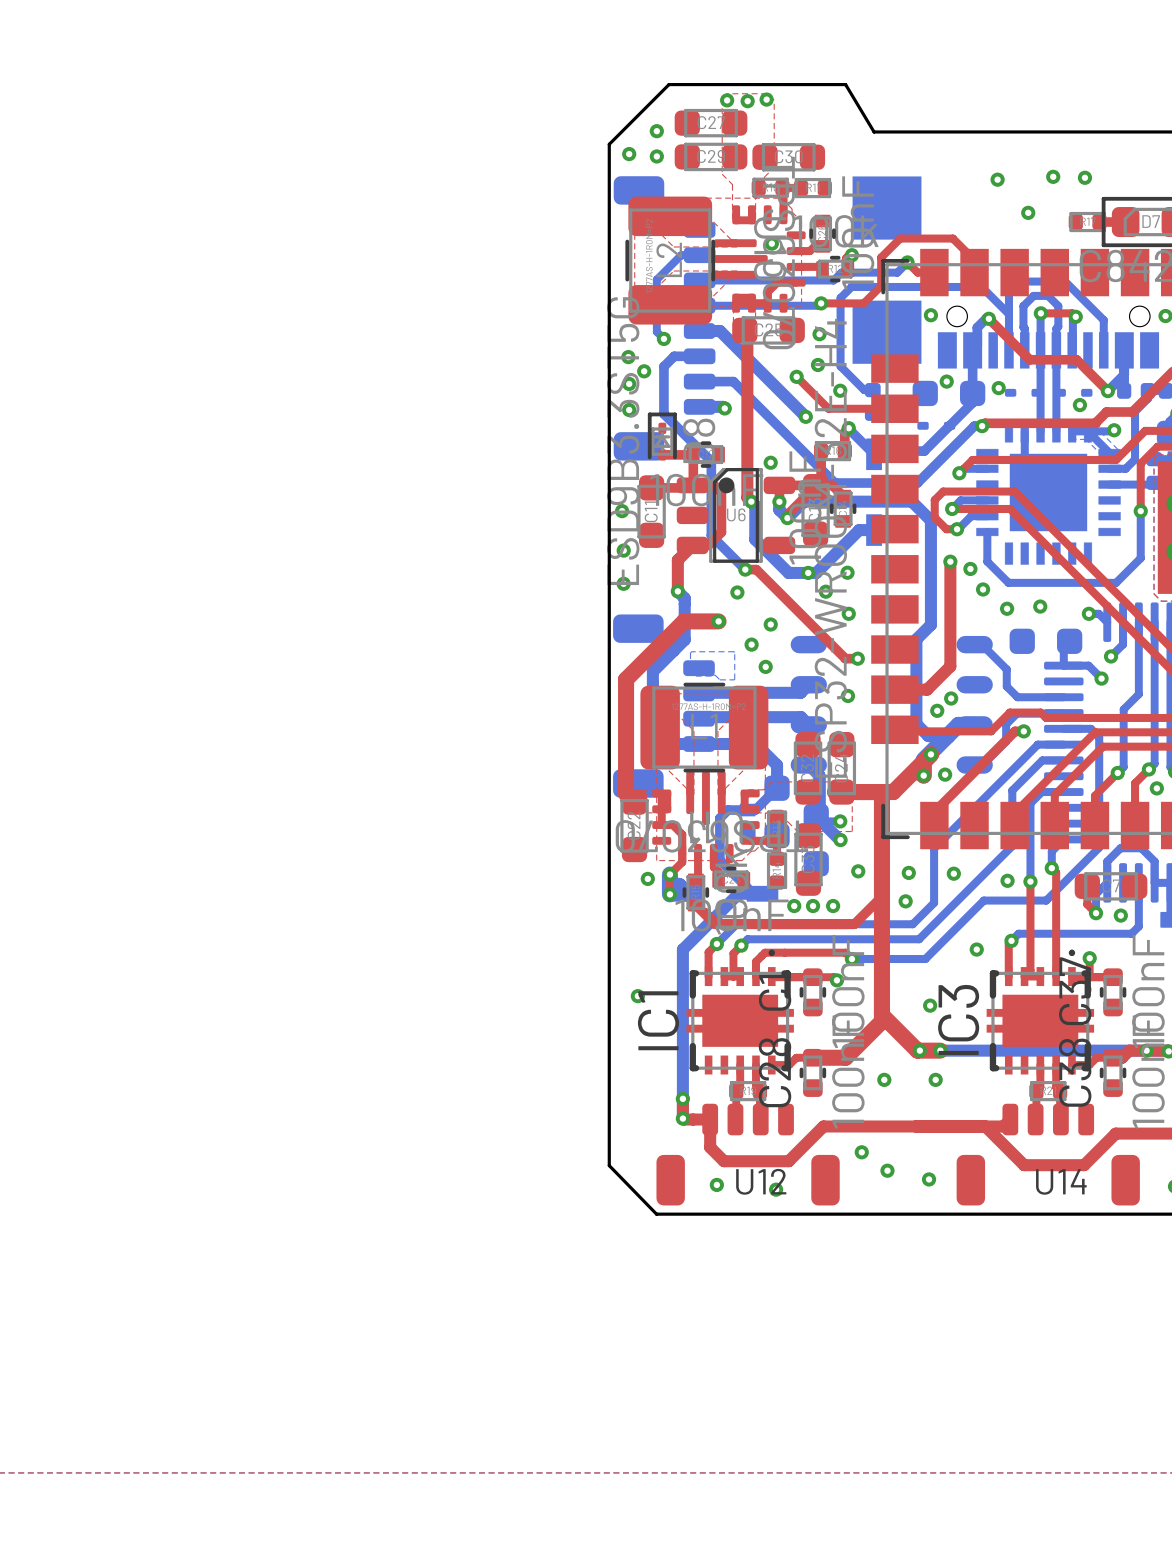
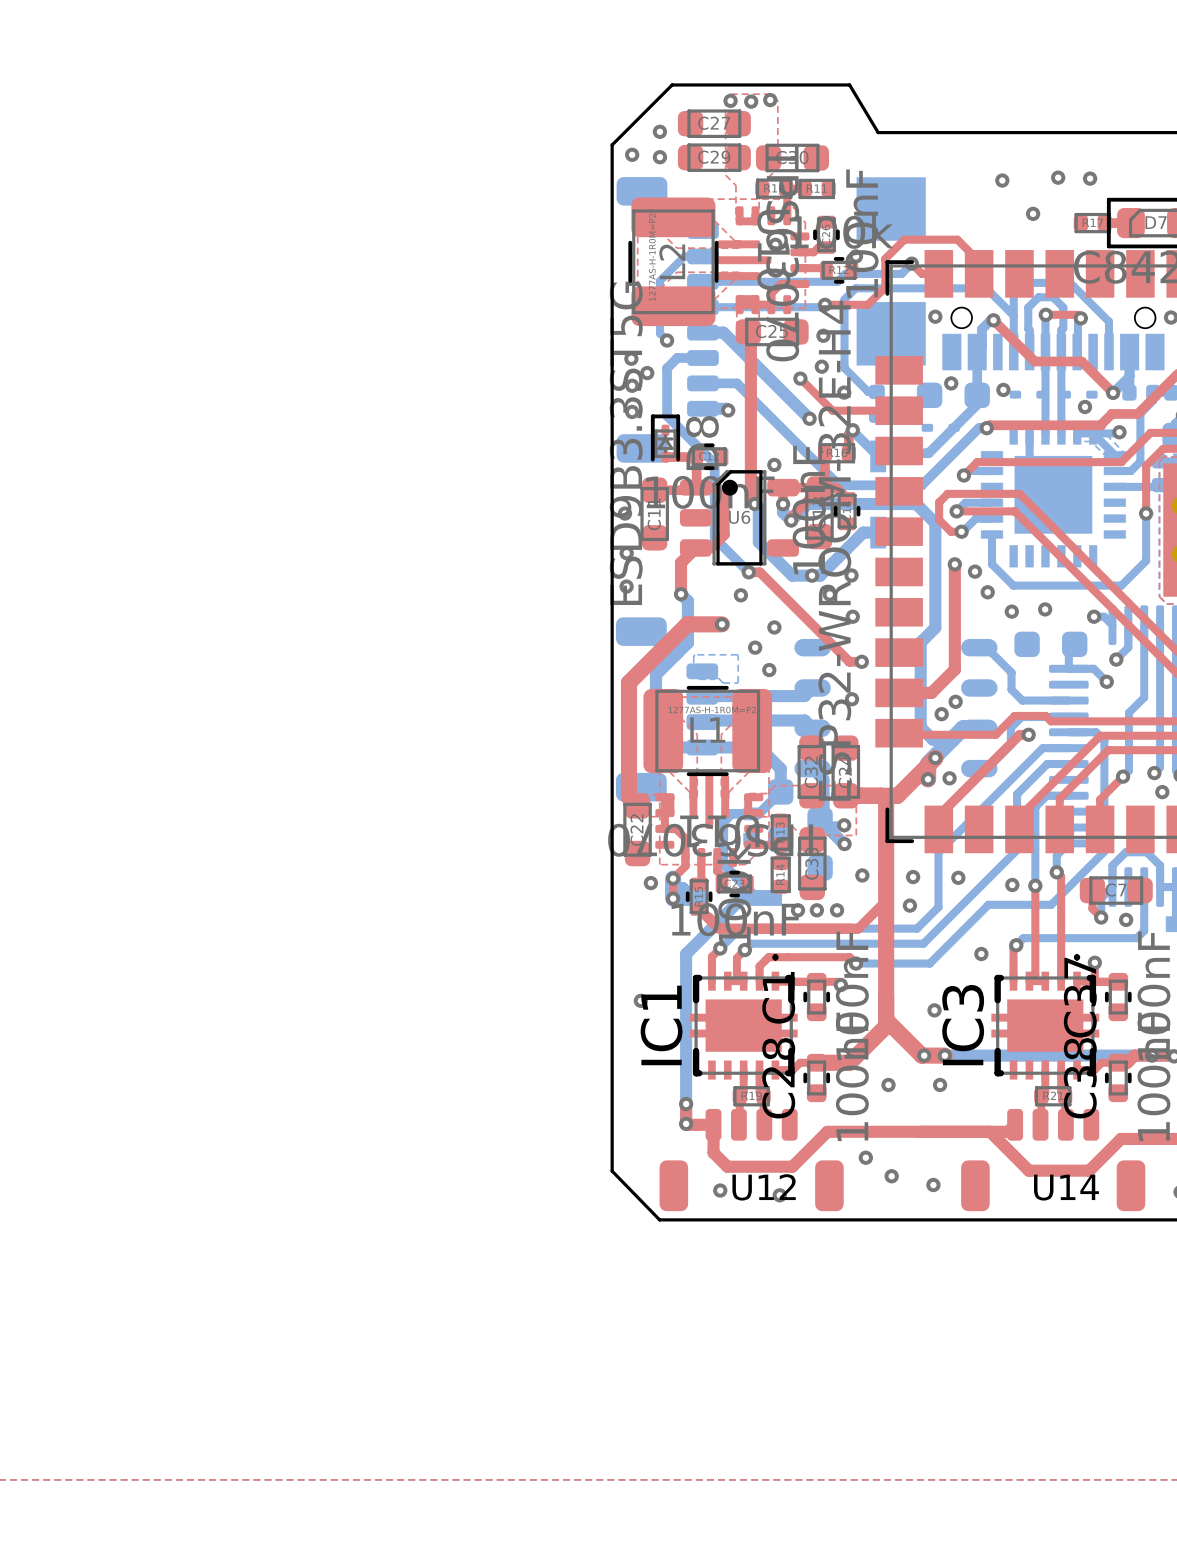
top track: (1148, 769) (1135, 783) (1135, 825) -> none

